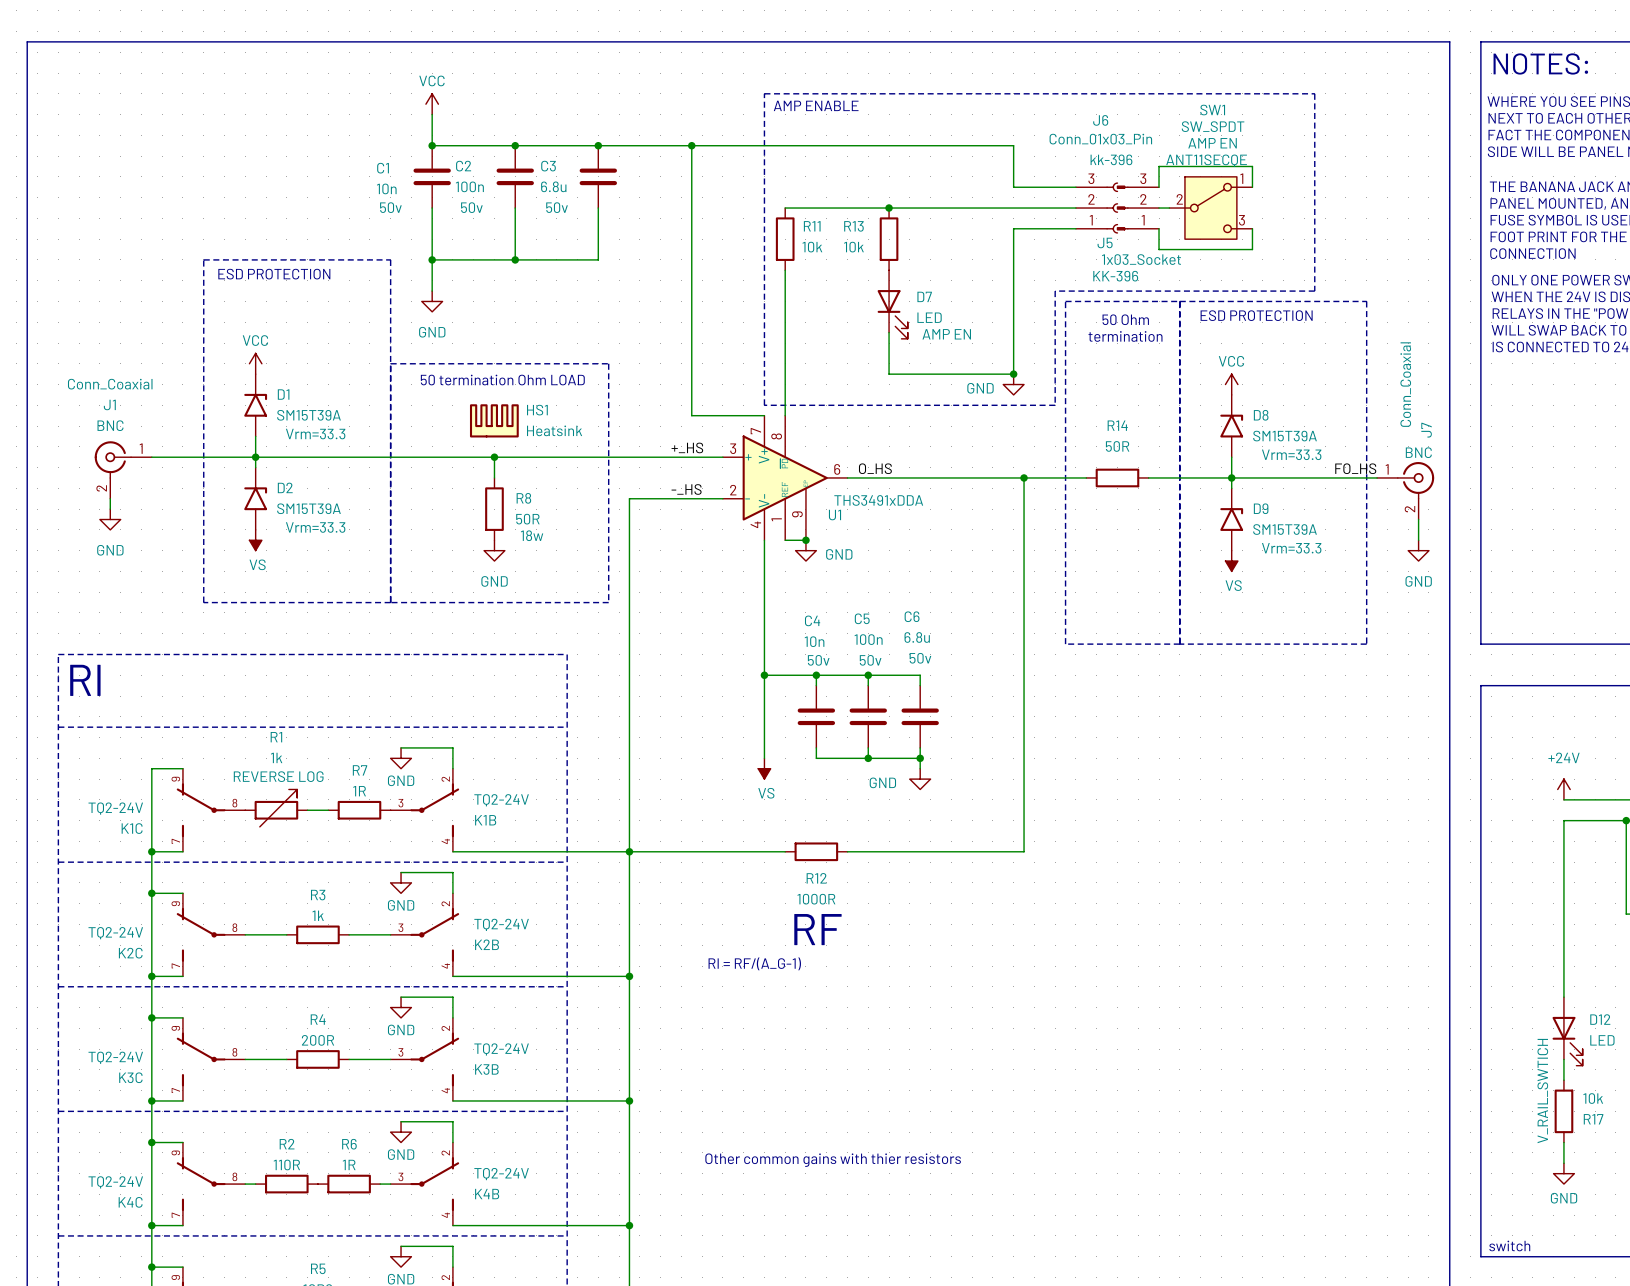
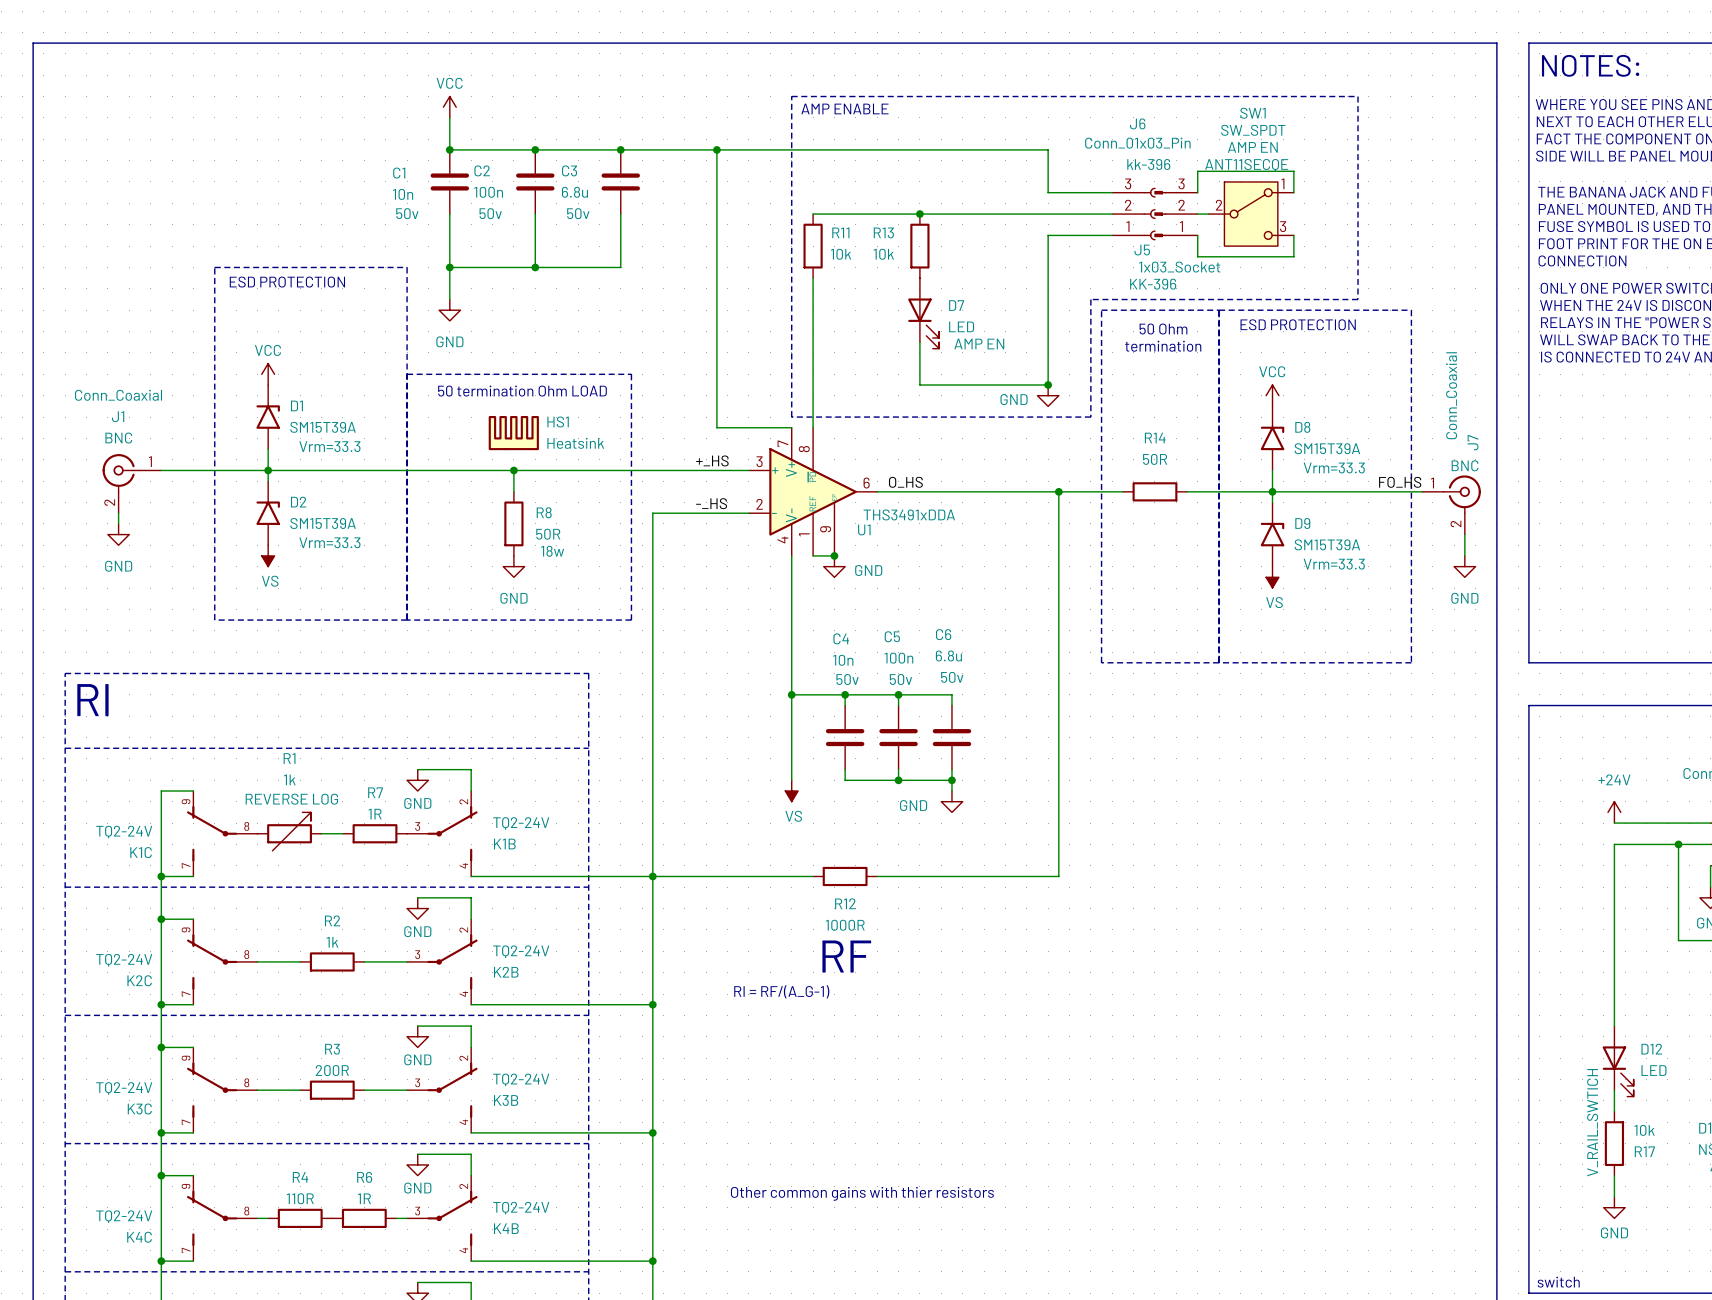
R3 name: R3 (318, 895) -> R2 (332, 920)
R4 name: R4 (318, 1019) -> R3 (332, 1049)
R2 name: R2 (287, 1144) -> R4 (300, 1177)

